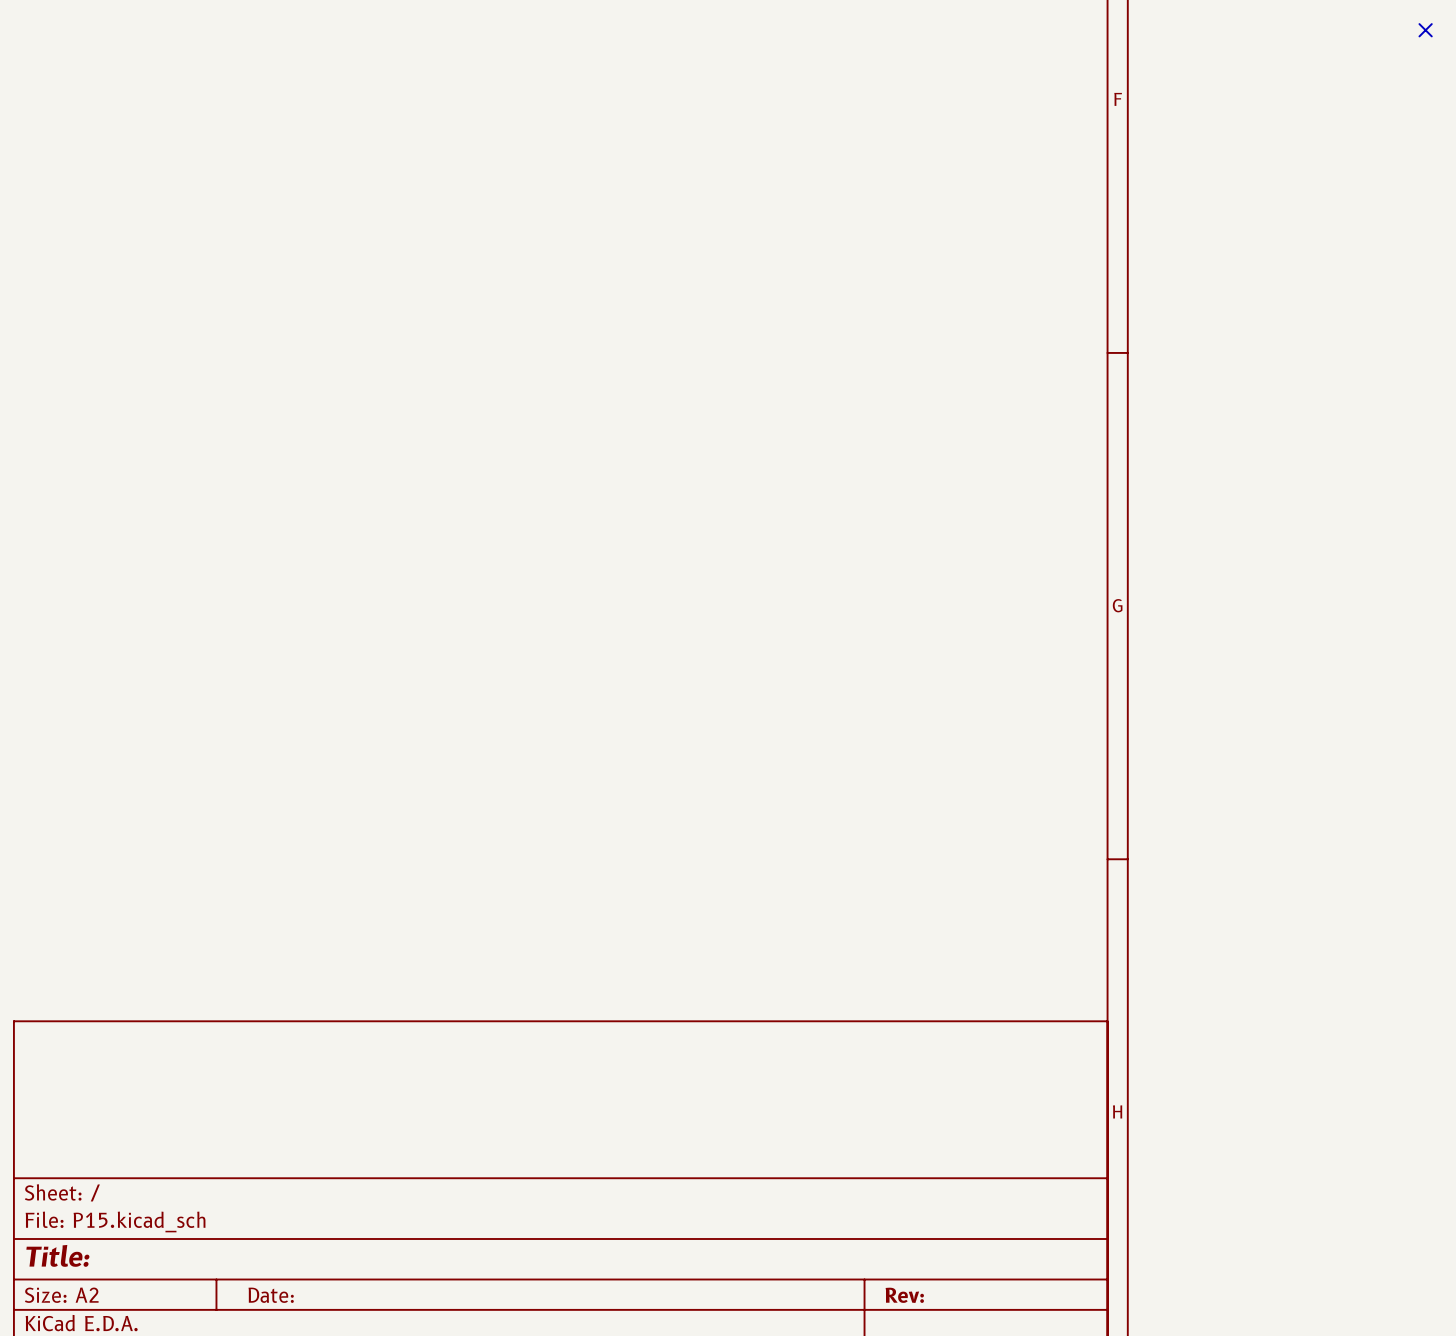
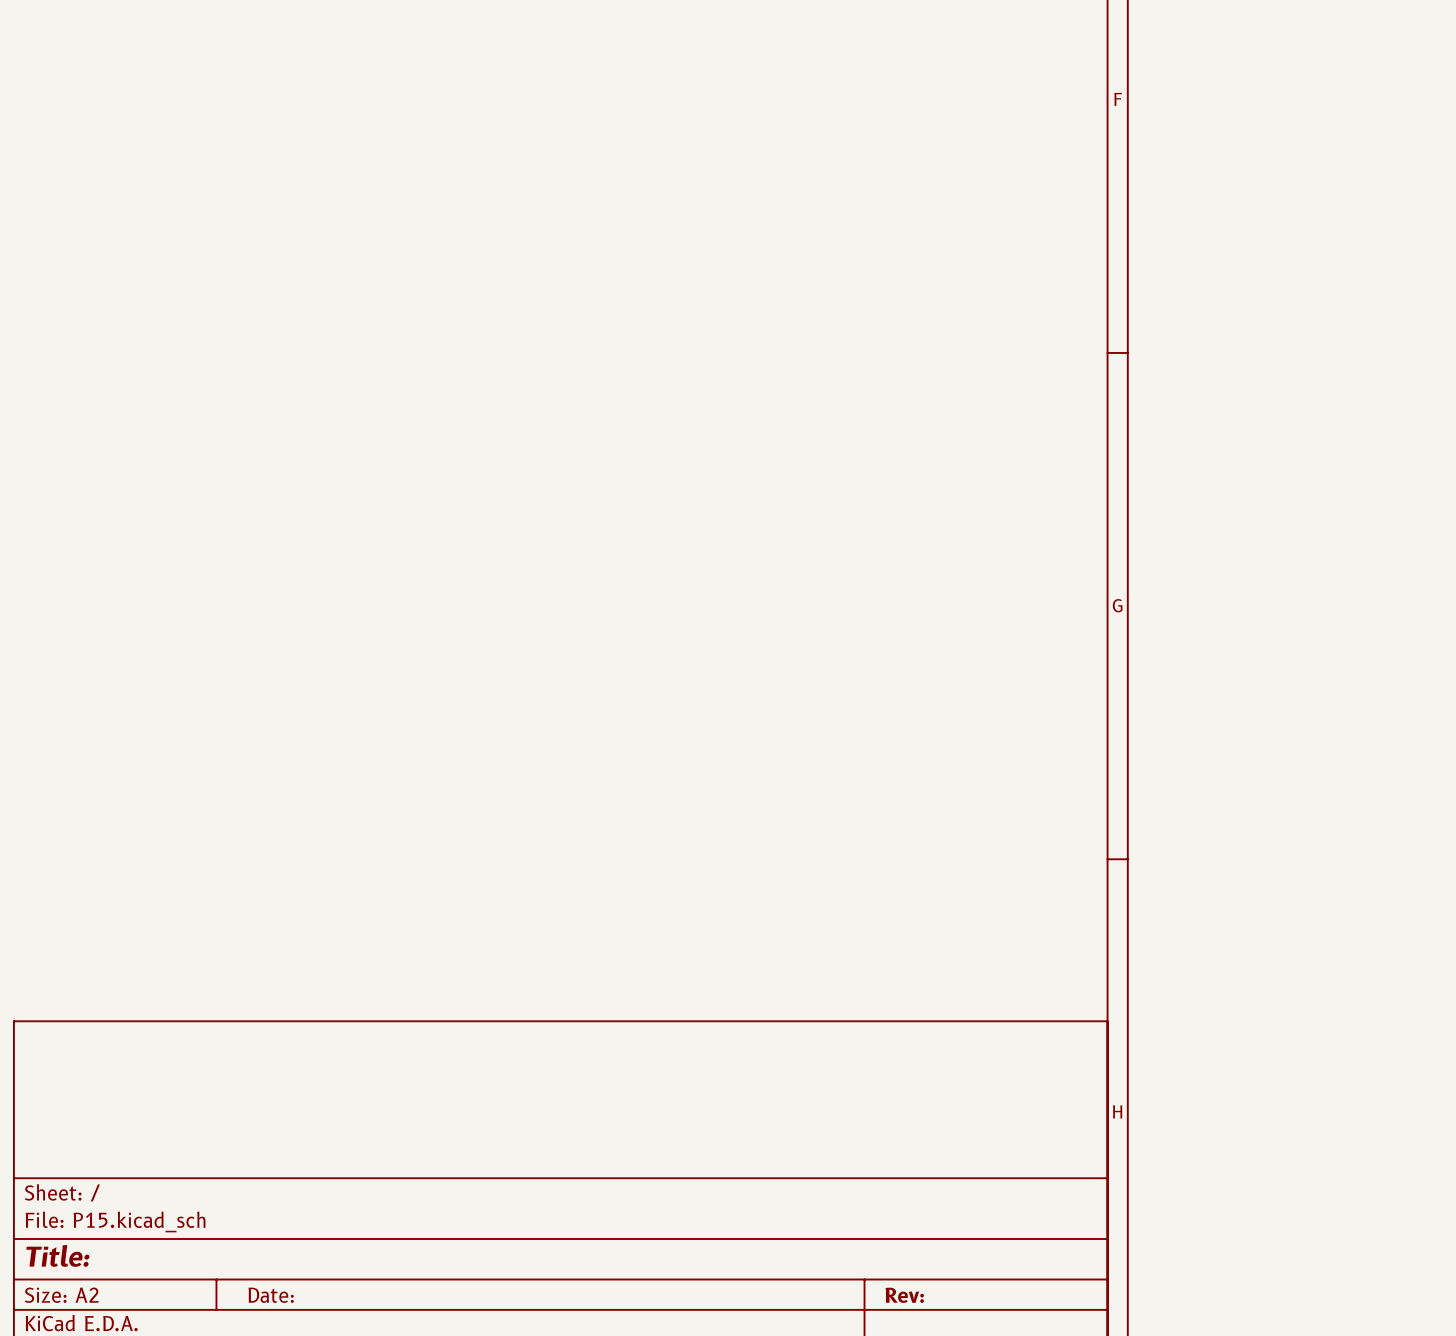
no-connect mark: (1425, 30) -> none

